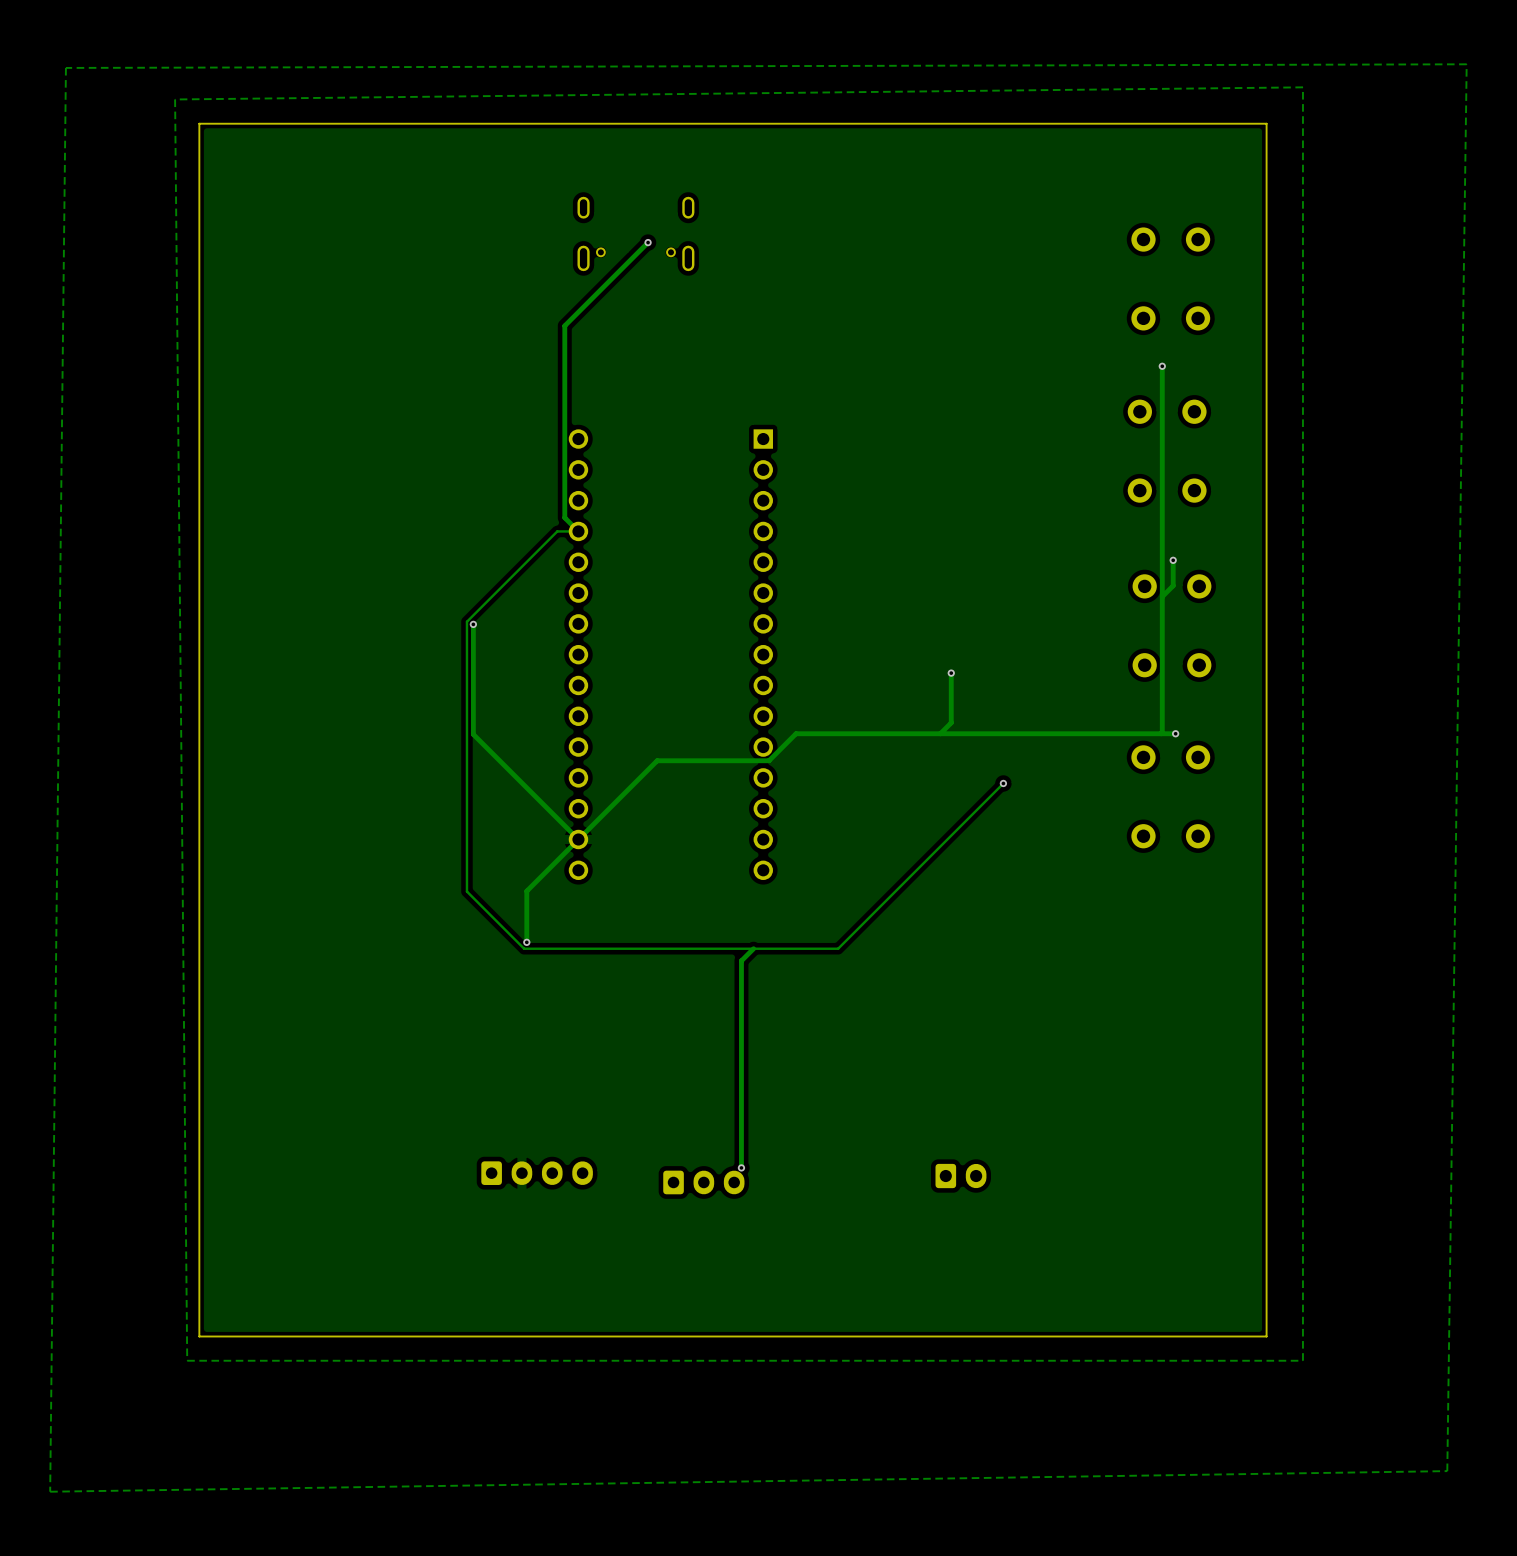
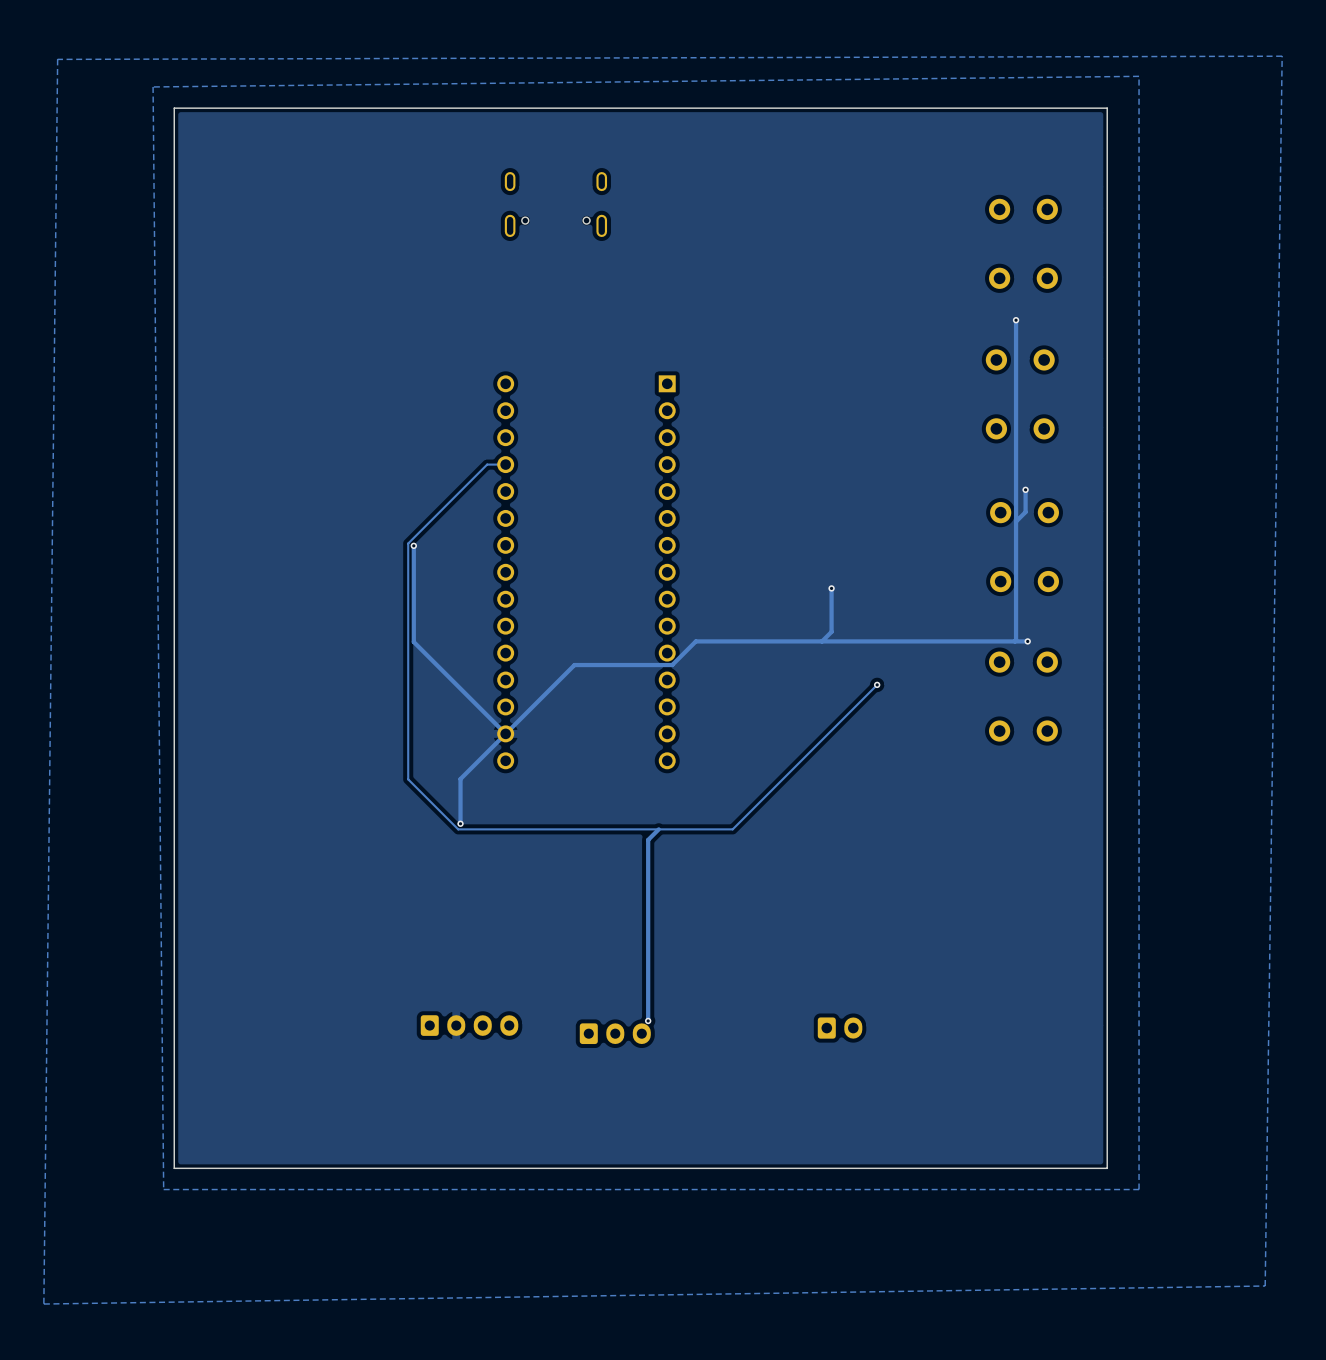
track: (648, 242) (564, 325) (564, 517) (578, 531) -> none
via: (648, 242) -> none

